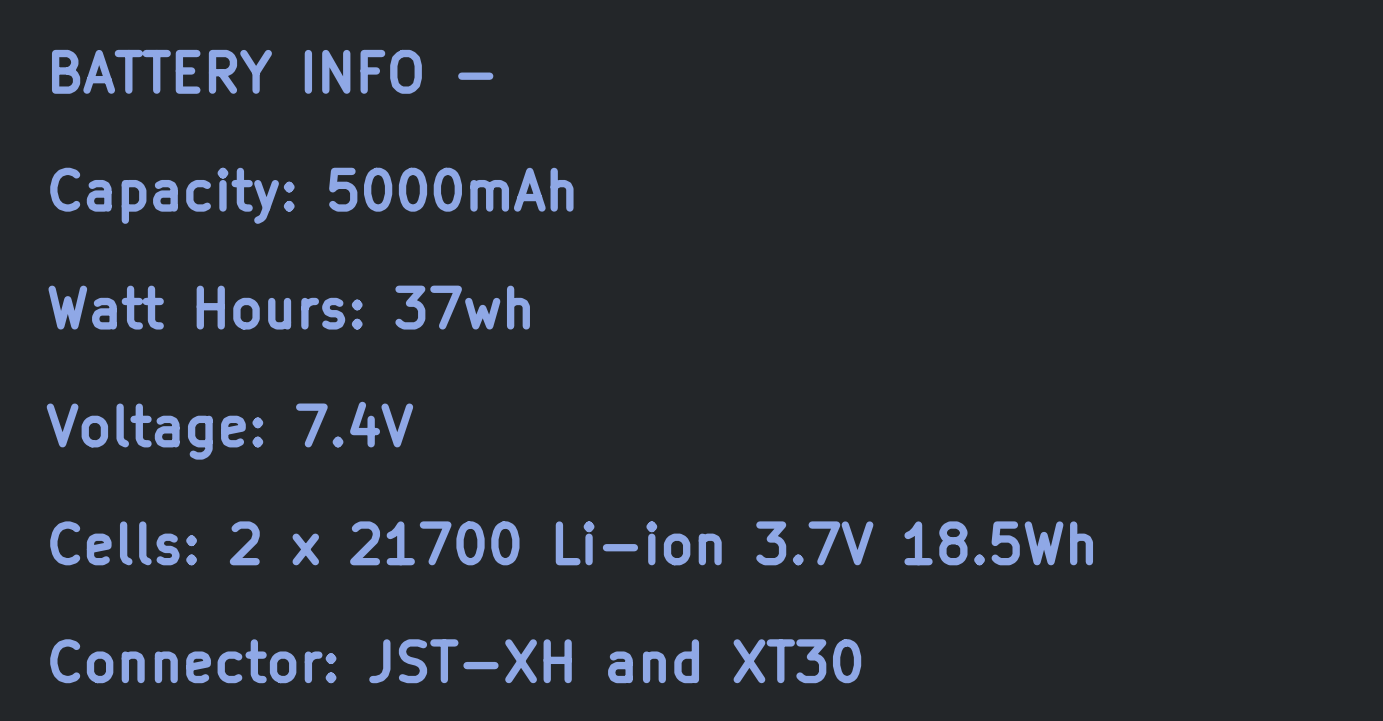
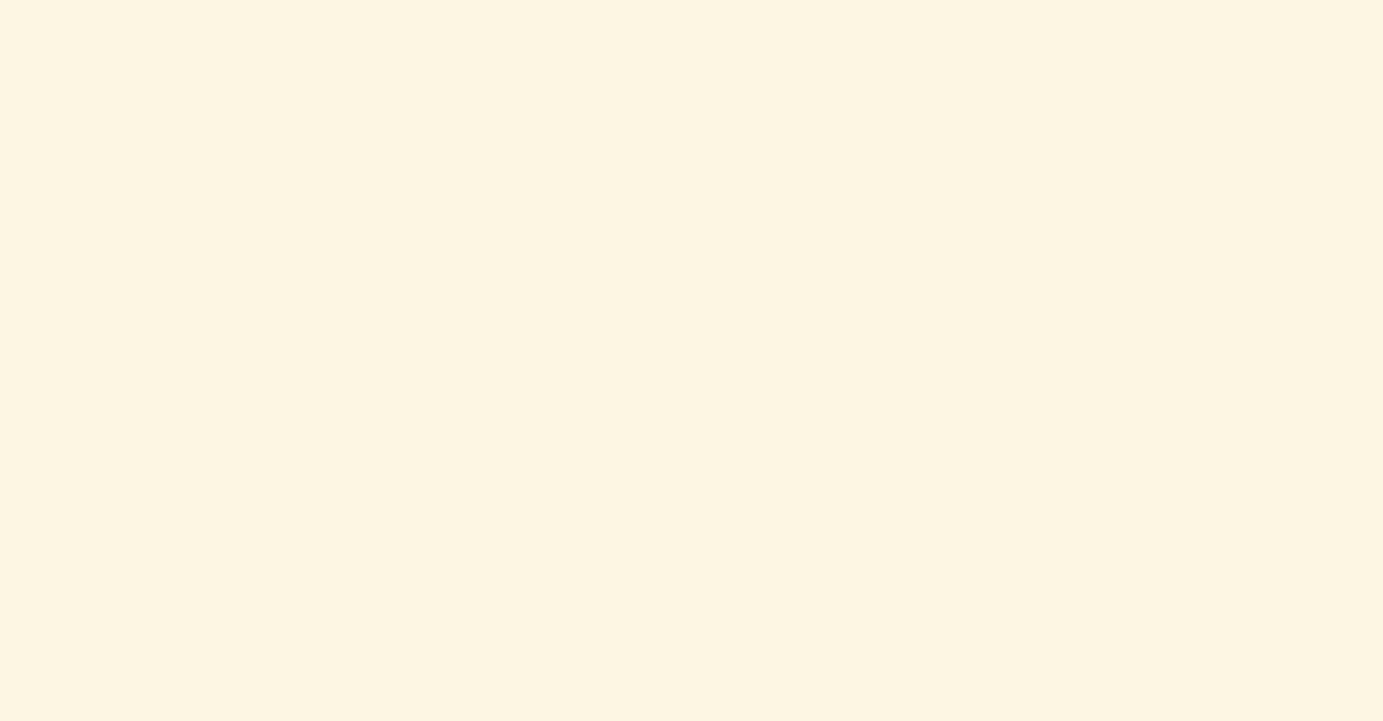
text: BATTERY INFO - (272, 71) -> none
text: Capacity: 5000mAh (311, 195) -> none
text: Watt Hours: 37wh (289, 307) -> none
text: Voltage: 7.4V (229, 430) -> none
text: Cells: 2 x 21700 Li-ion 3.7V 18.5Wh (571, 543) -> none
text: Connector: JST-XH and XT30 (455, 661) -> none

